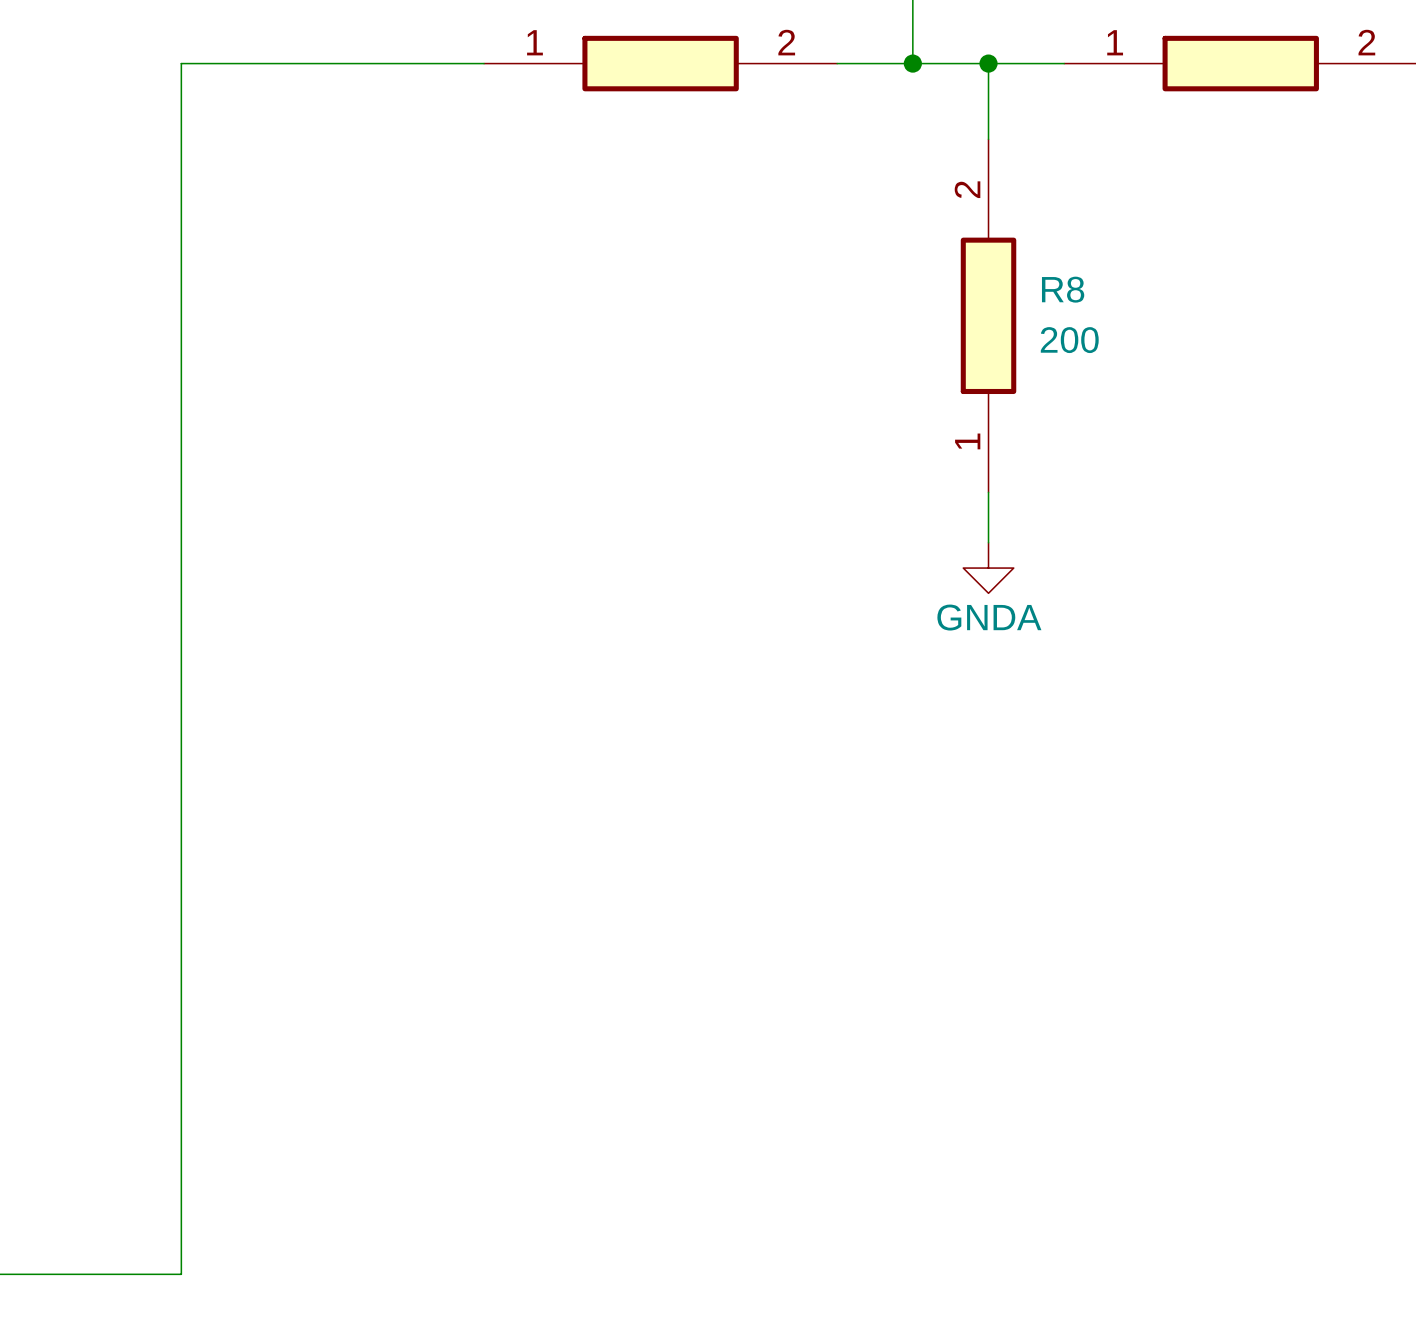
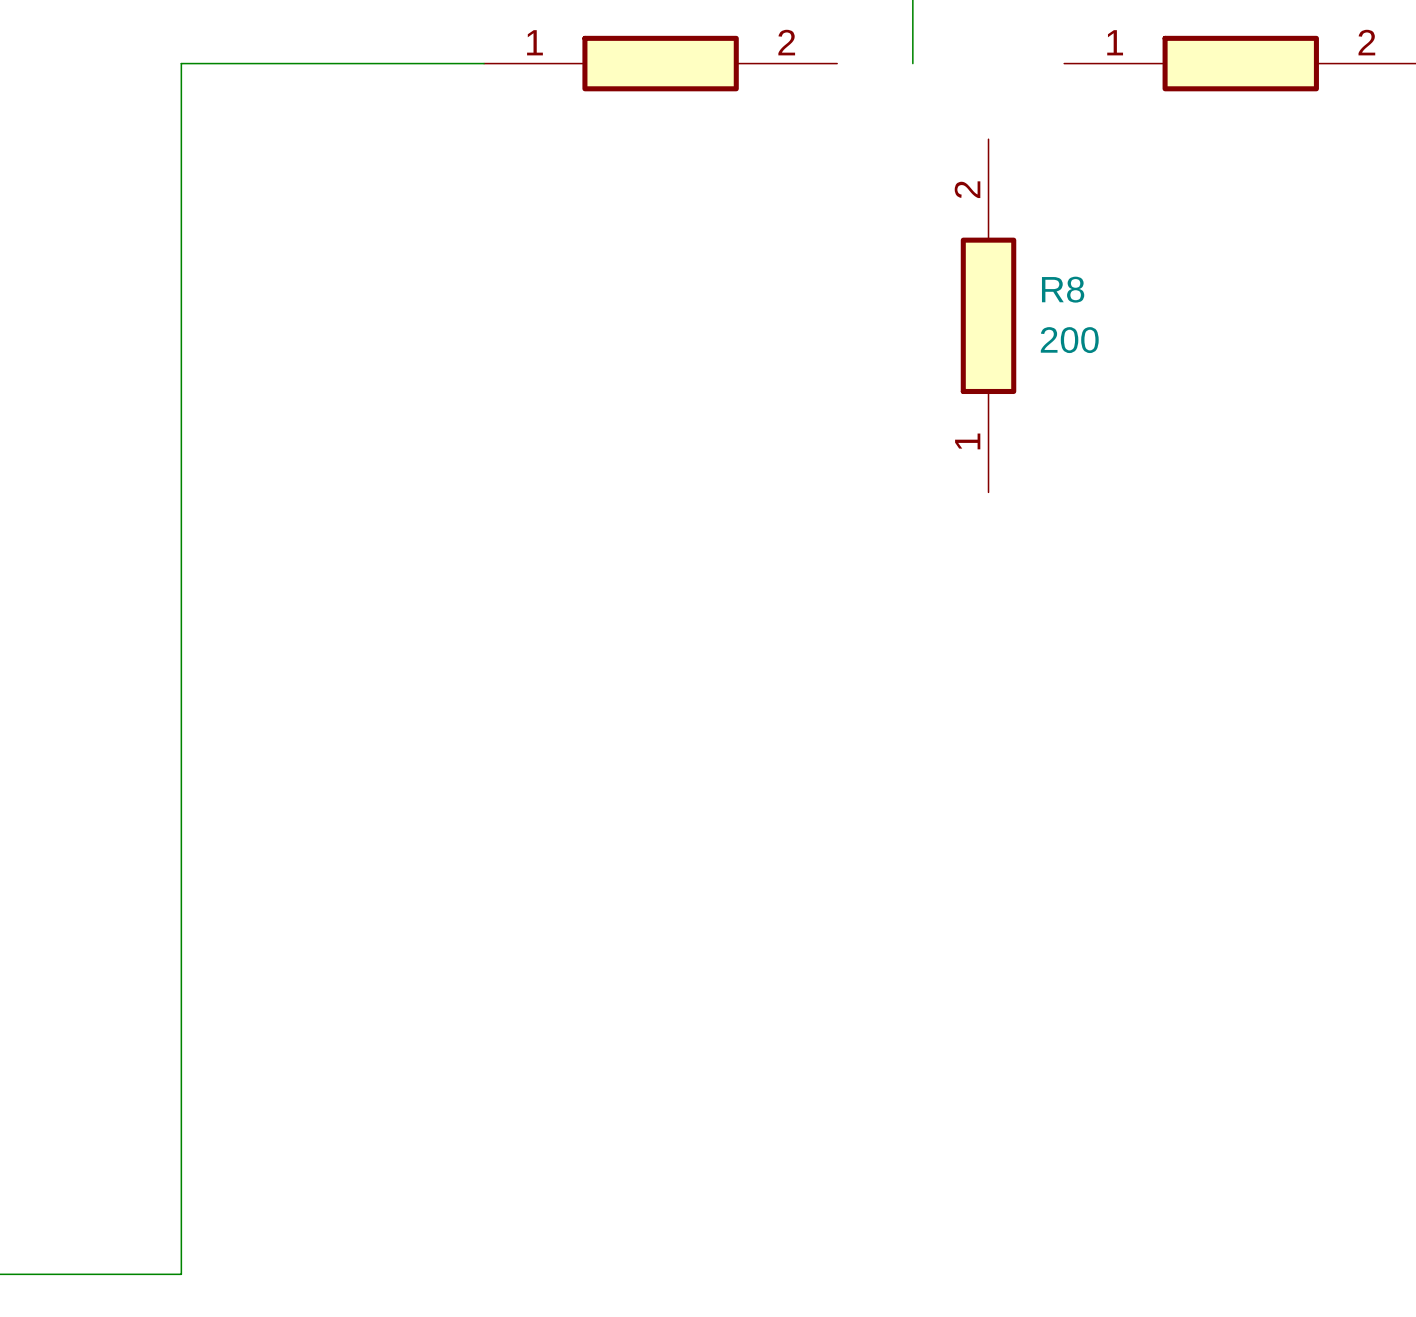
wire: (837, 63) (1064, 63) -> none
junction: (912, 63) -> none
wire: (988, 63) (988, 139) -> none
junction: (988, 63) -> none
wire: (988, 492) (988, 542) -> none
power symbol: GNDA (988, 568) -> none

